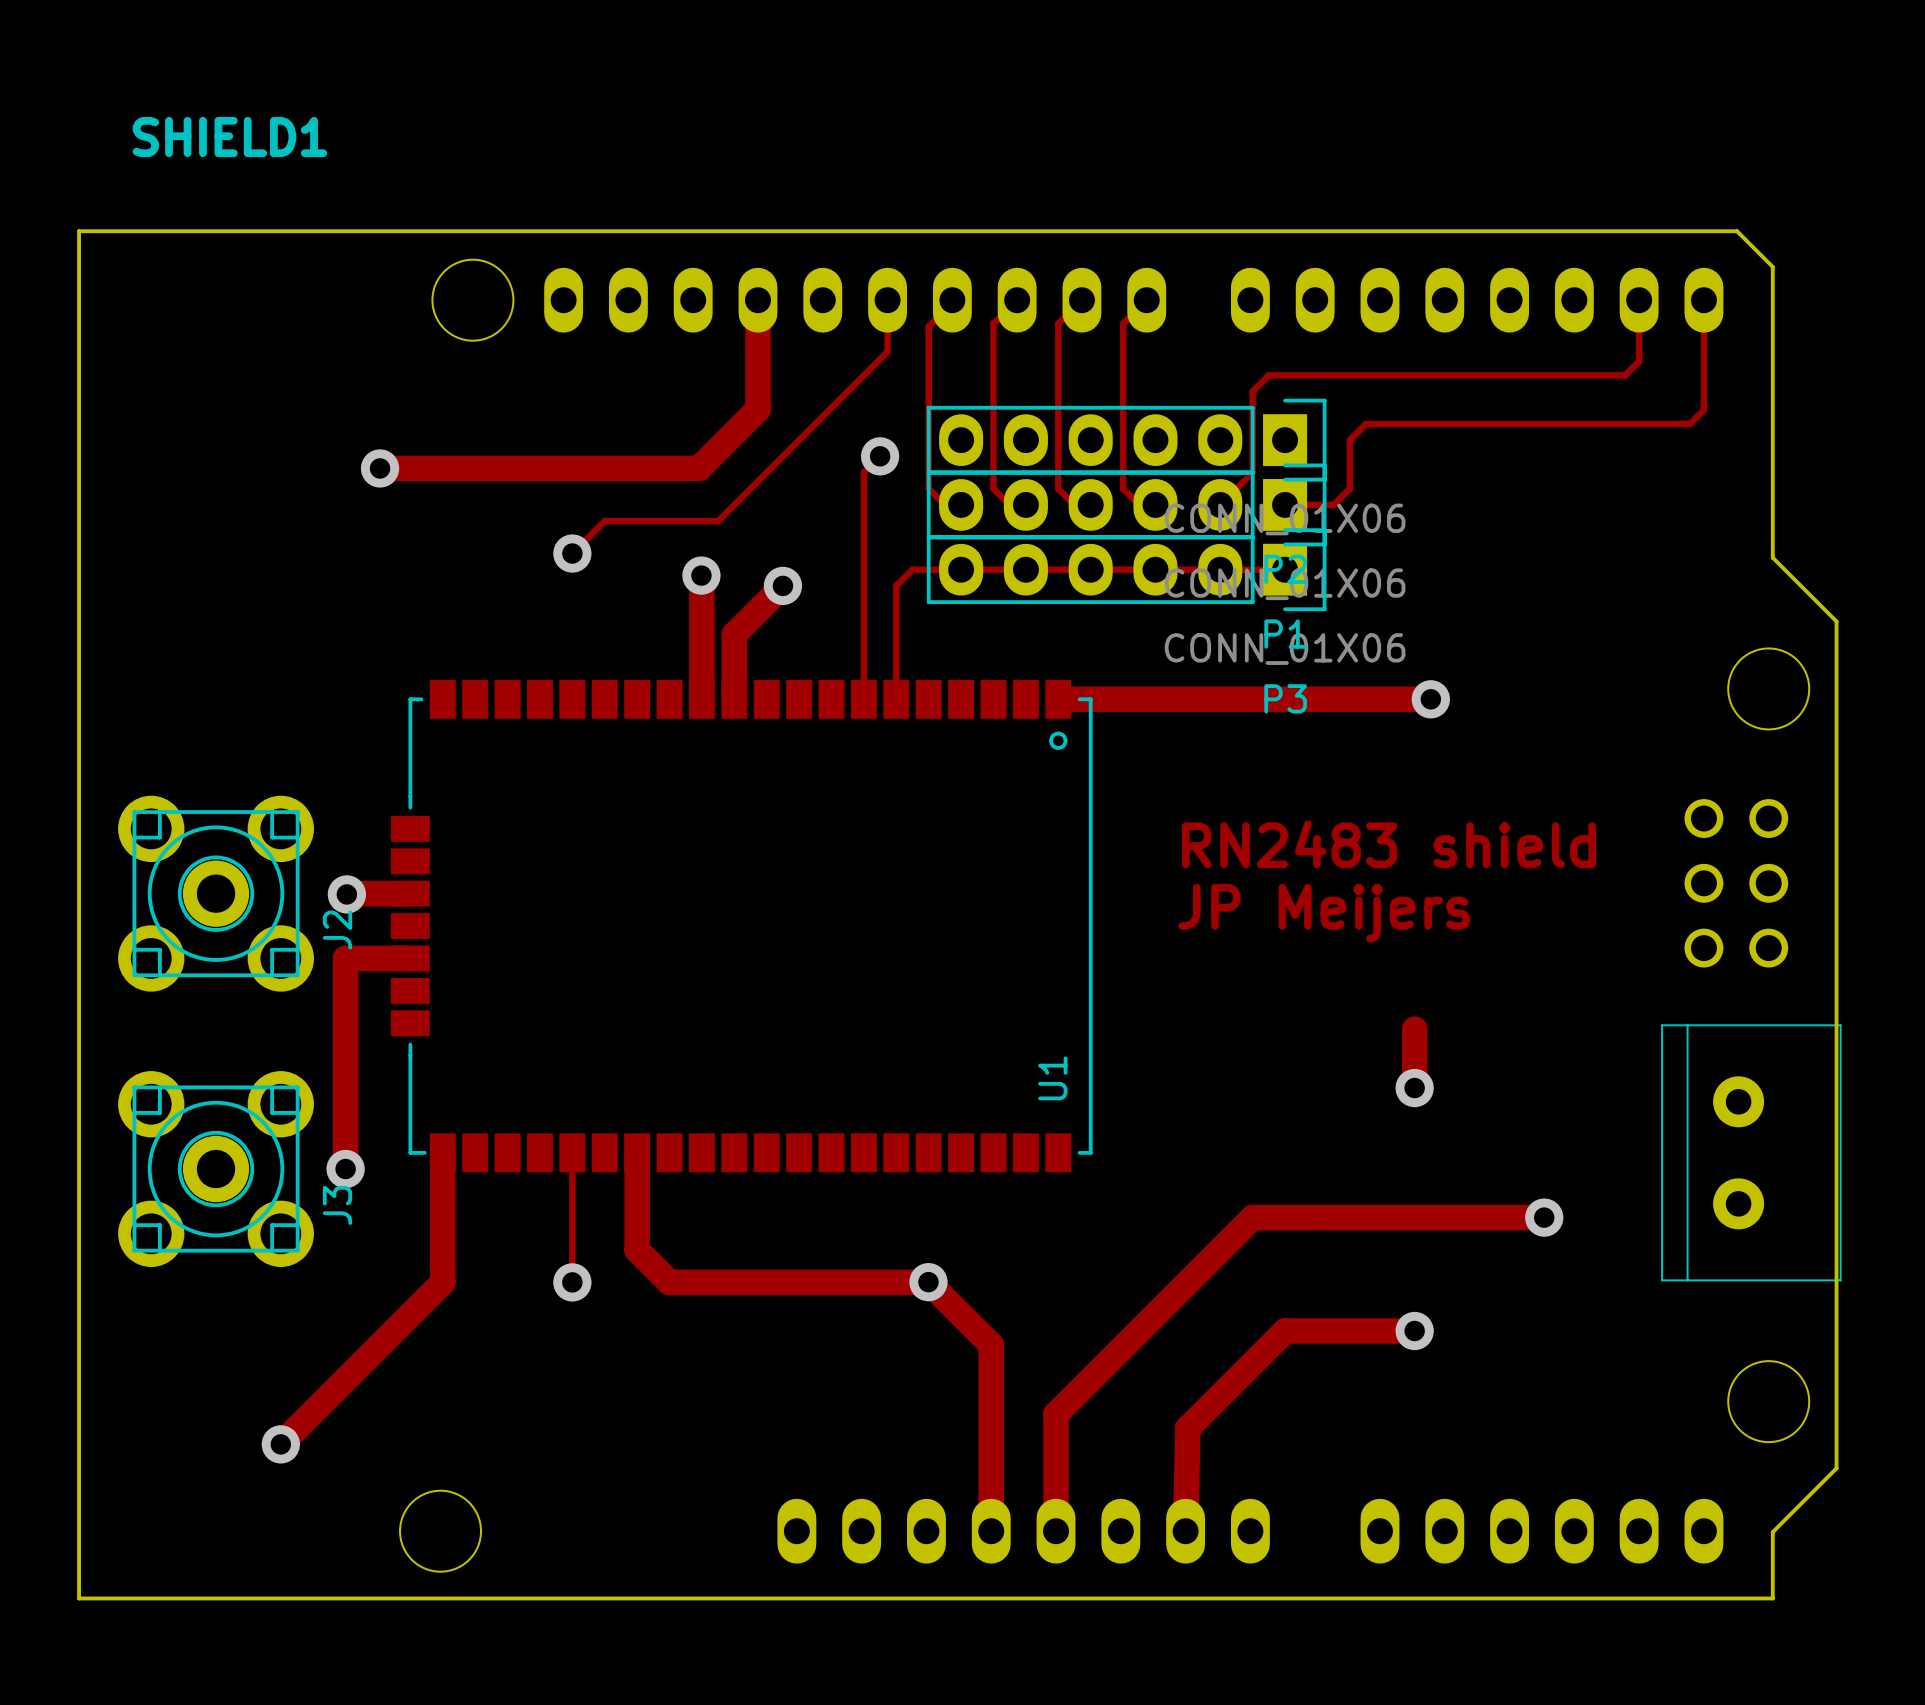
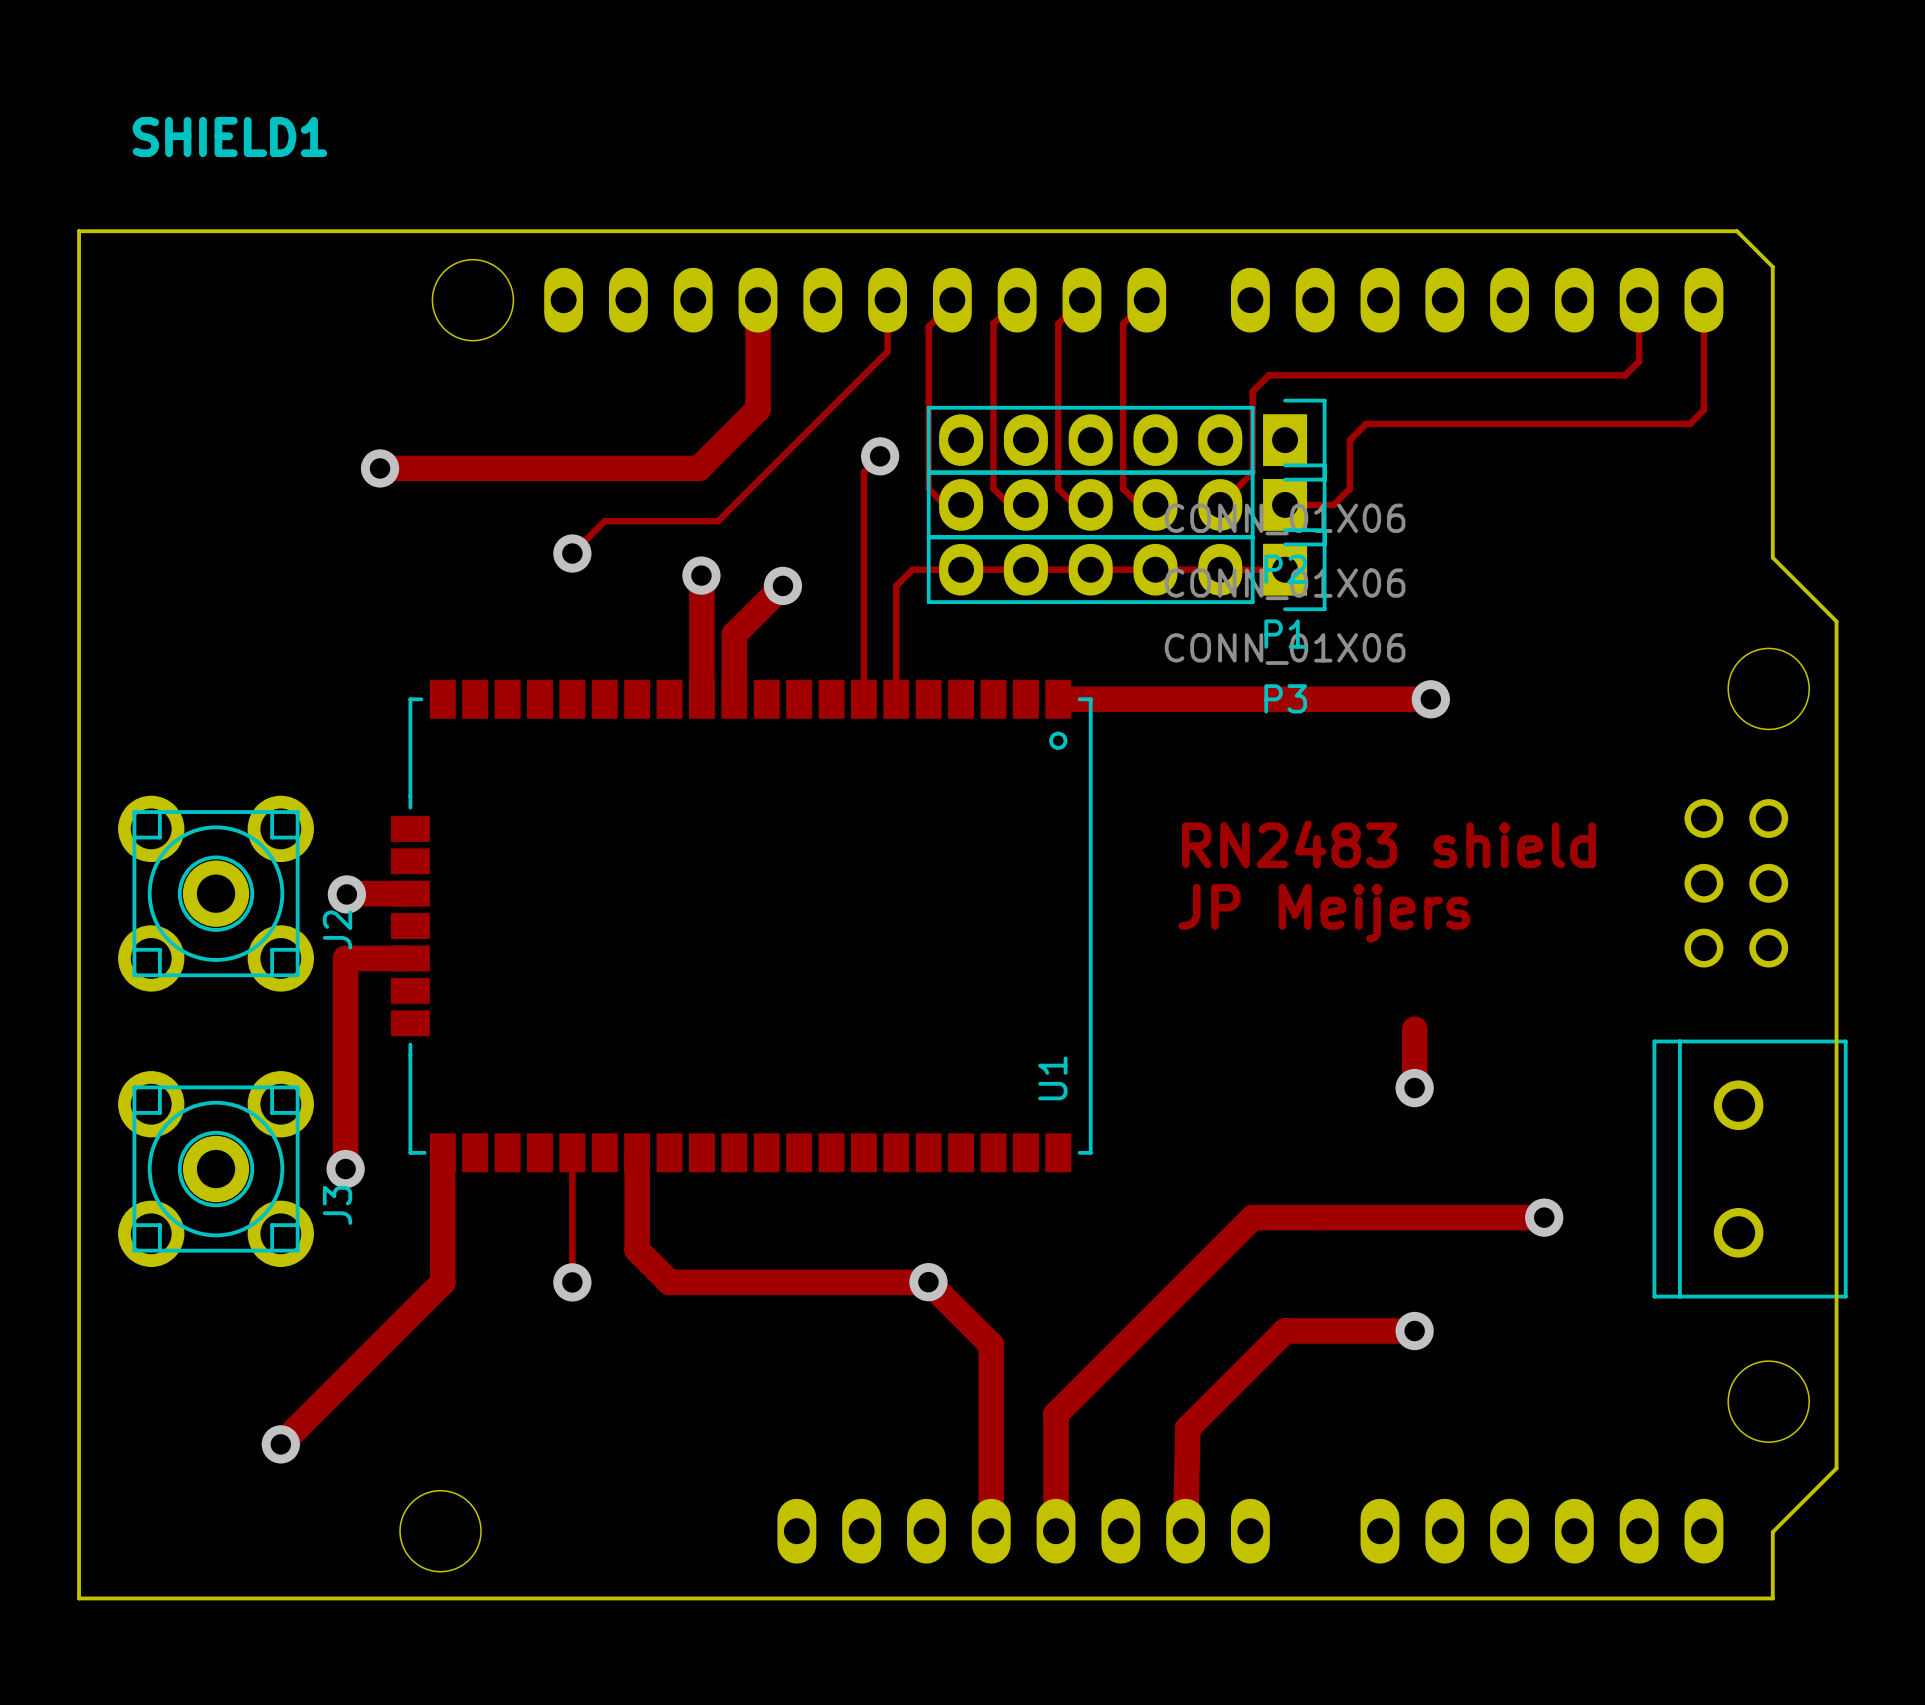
part footprint: [1662, 1025, 1841, 1281] -> [1652, 1039, 1848, 1299]

